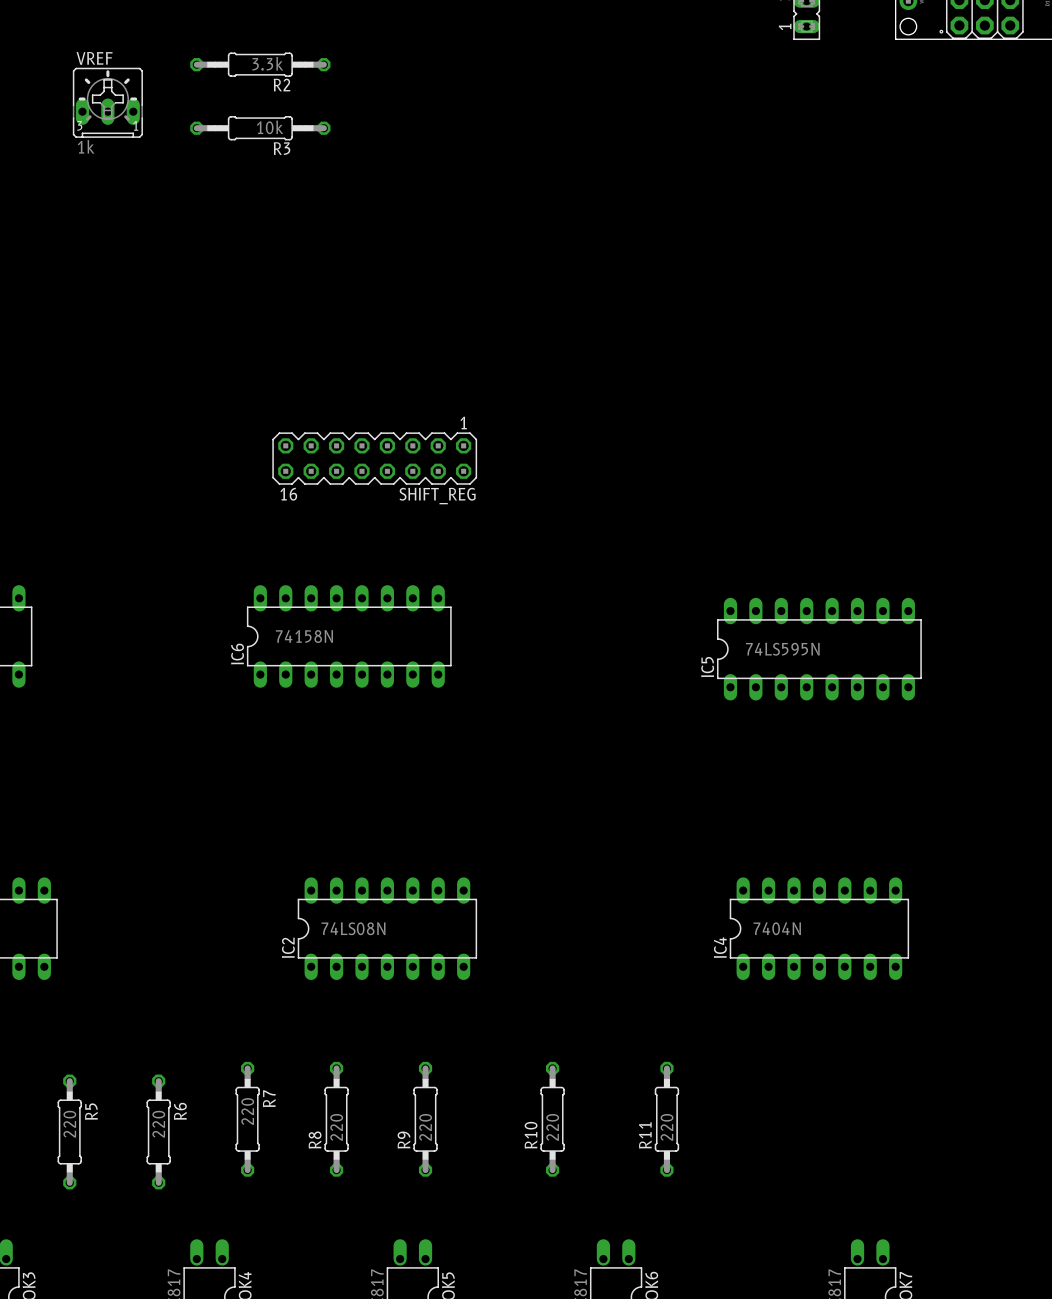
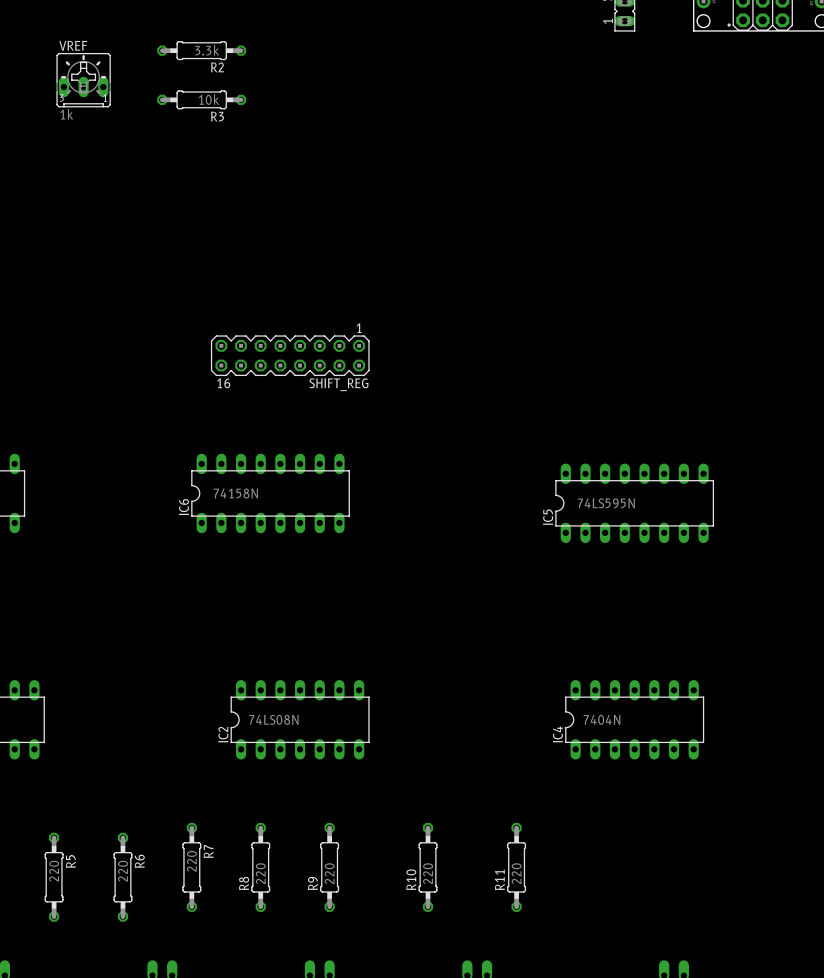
R2 footprint: [190, 52, 331, 77] -> [157, 41, 247, 61]
R3 footprint: [190, 116, 331, 141] -> [157, 90, 247, 110]

